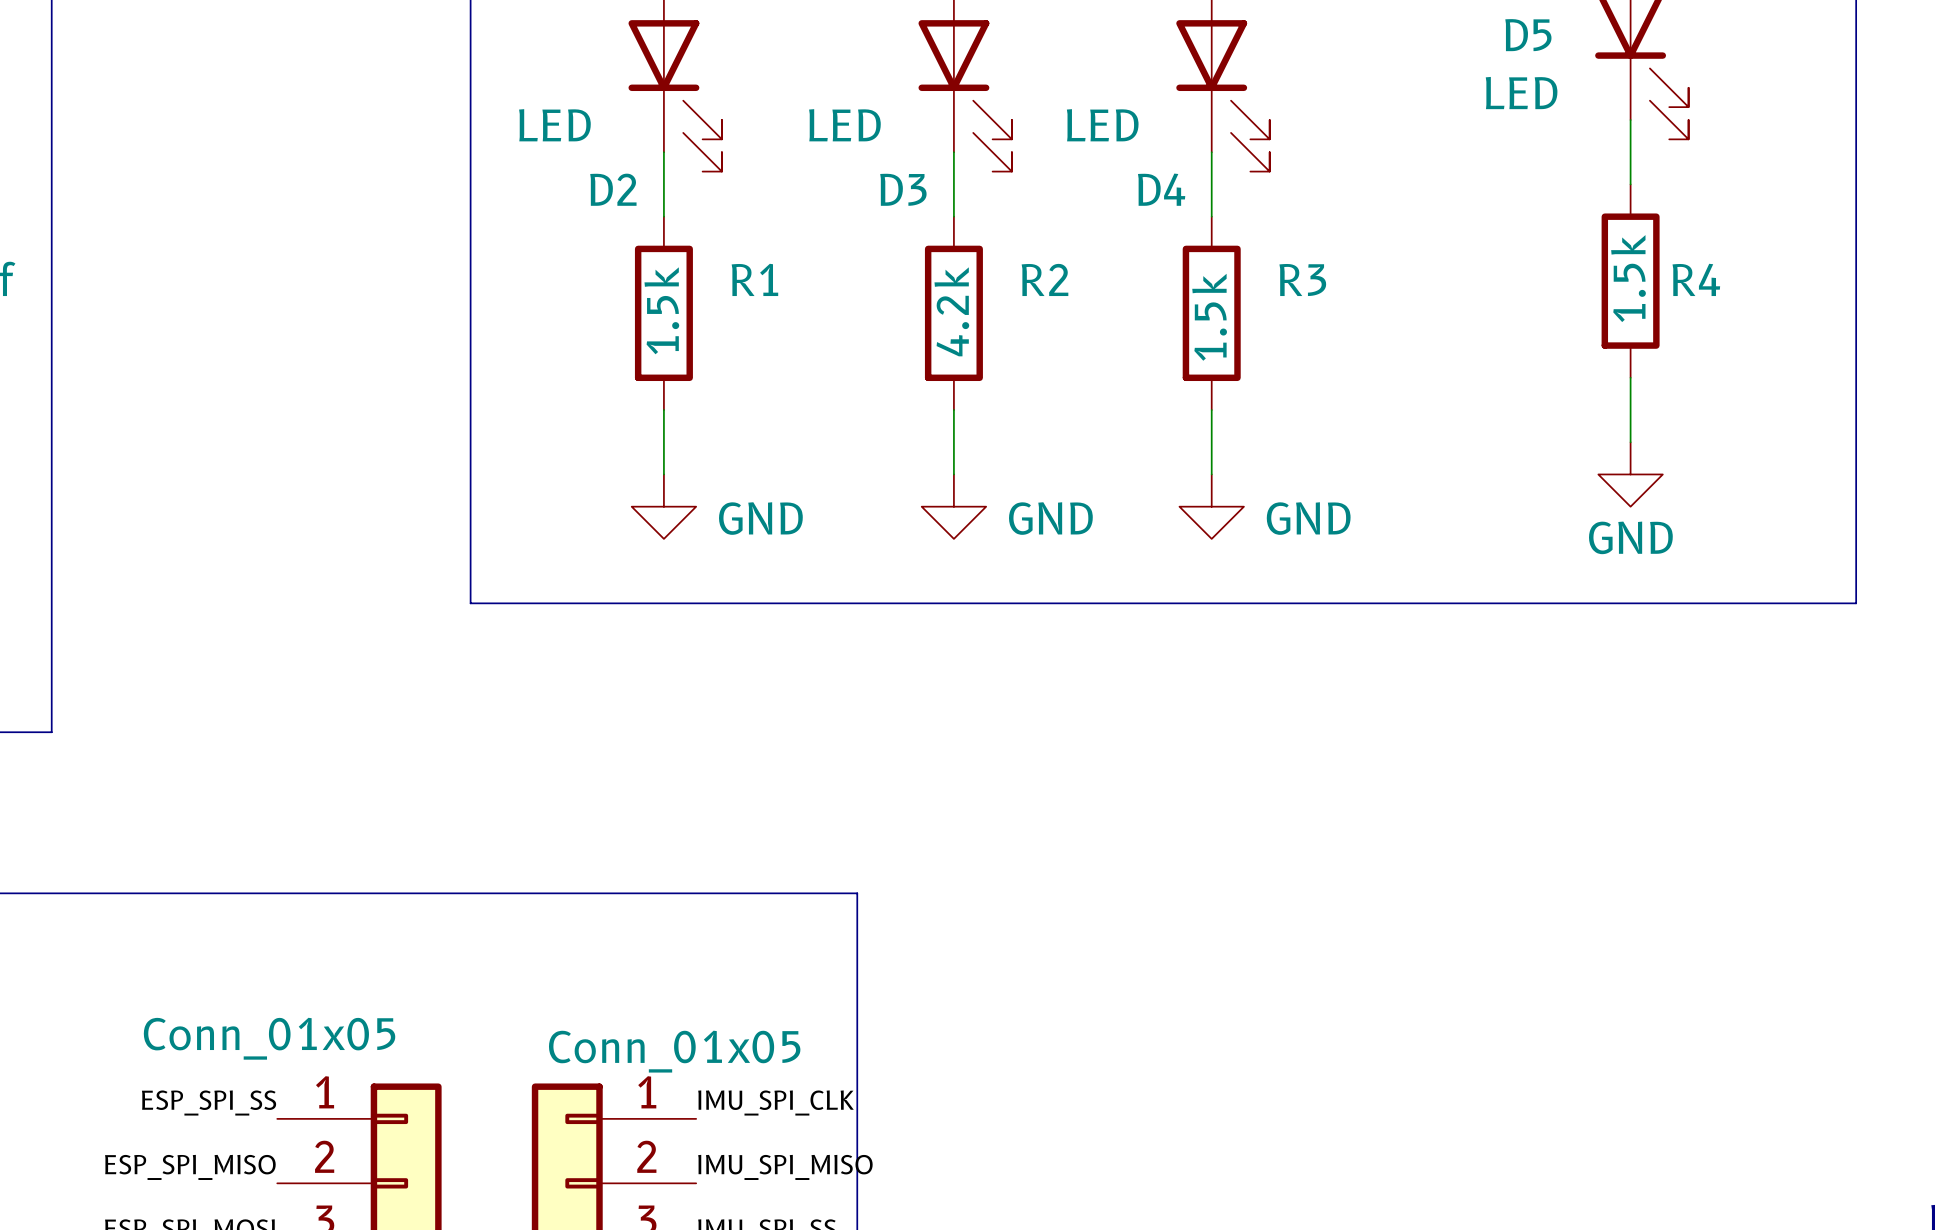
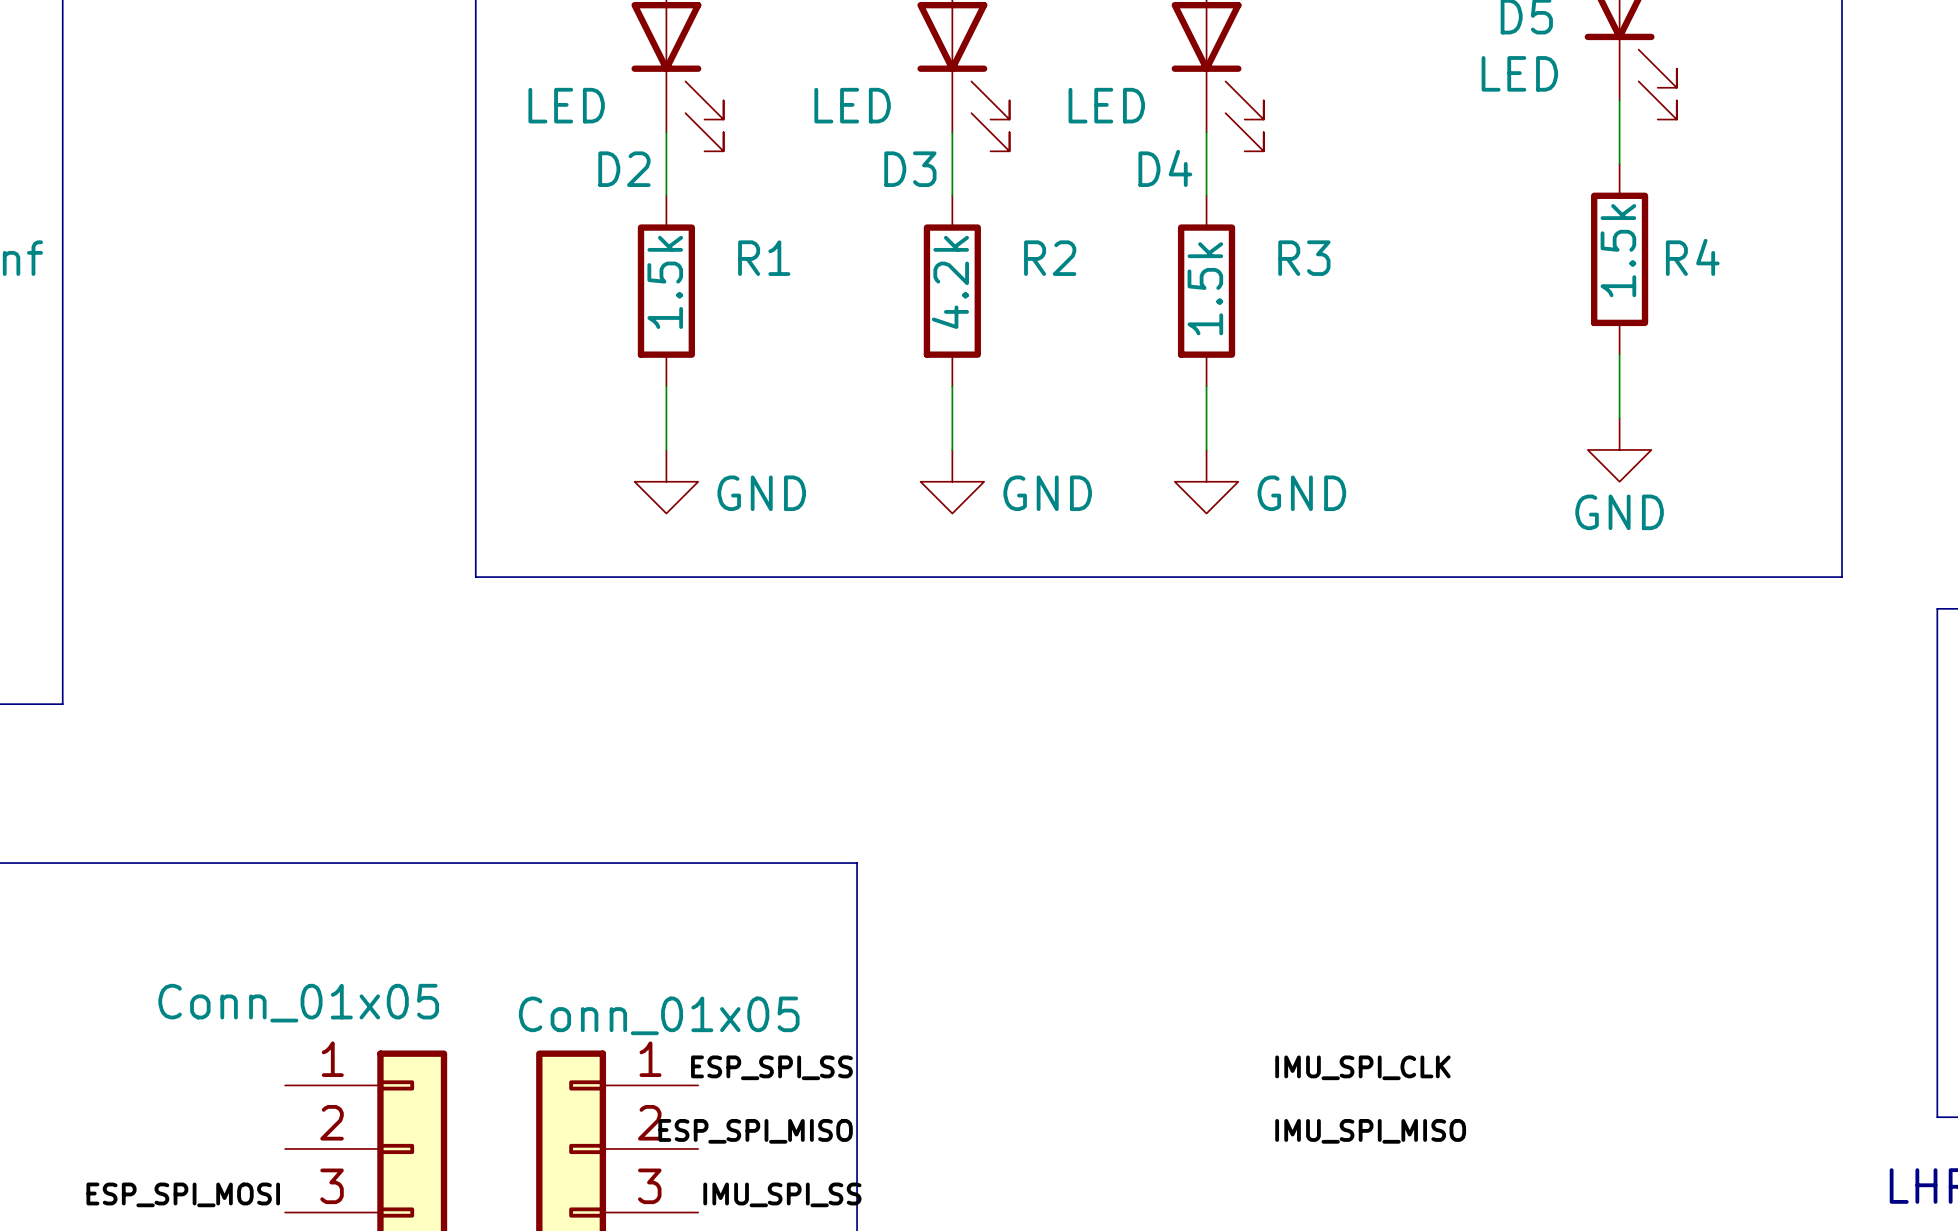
label position: ESP_SPI_SS (209, 1102) -> ESP_SPI_SS (771, 1067)
label position: IMU_SPI_CLK (775, 1102) -> IMU_SPI_CLK (1362, 1067)
label position: ESP_SPI_MISO (190, 1167) -> ESP_SPI_MISO (755, 1131)
label position: IMU_SPI_MISO (785, 1167) -> IMU_SPI_MISO (1370, 1131)

